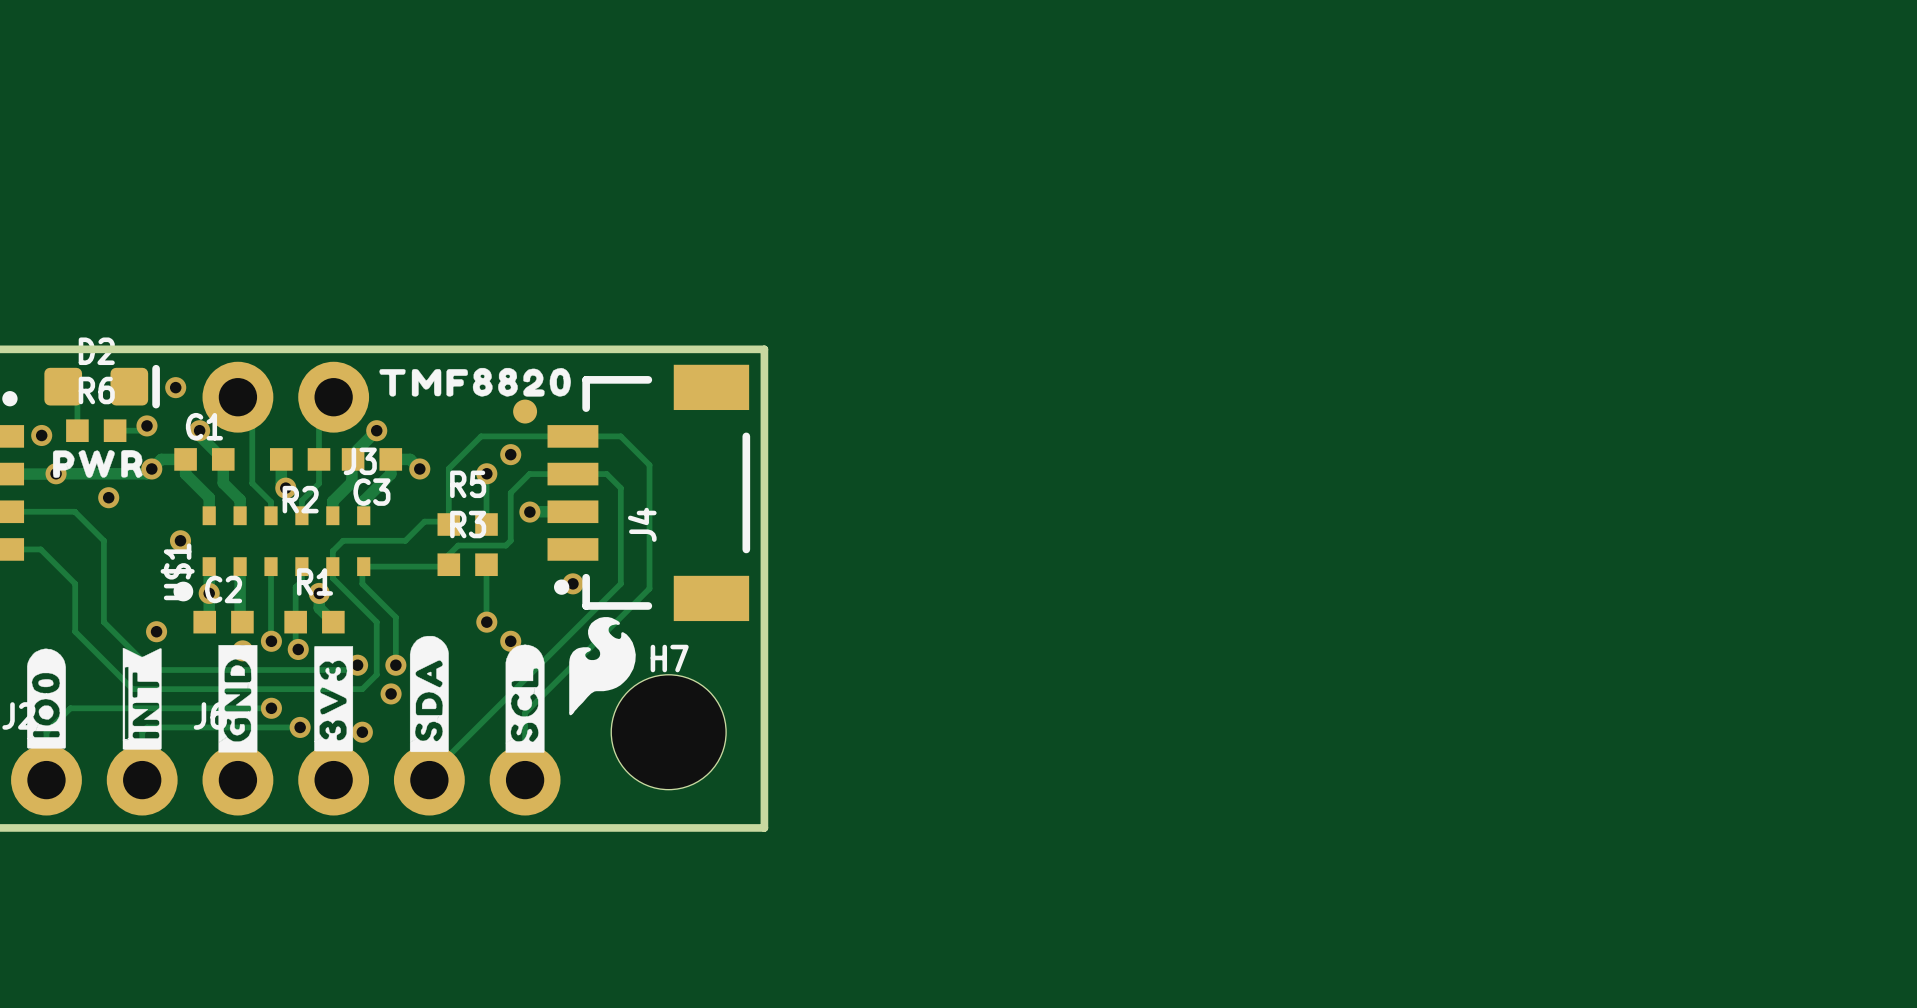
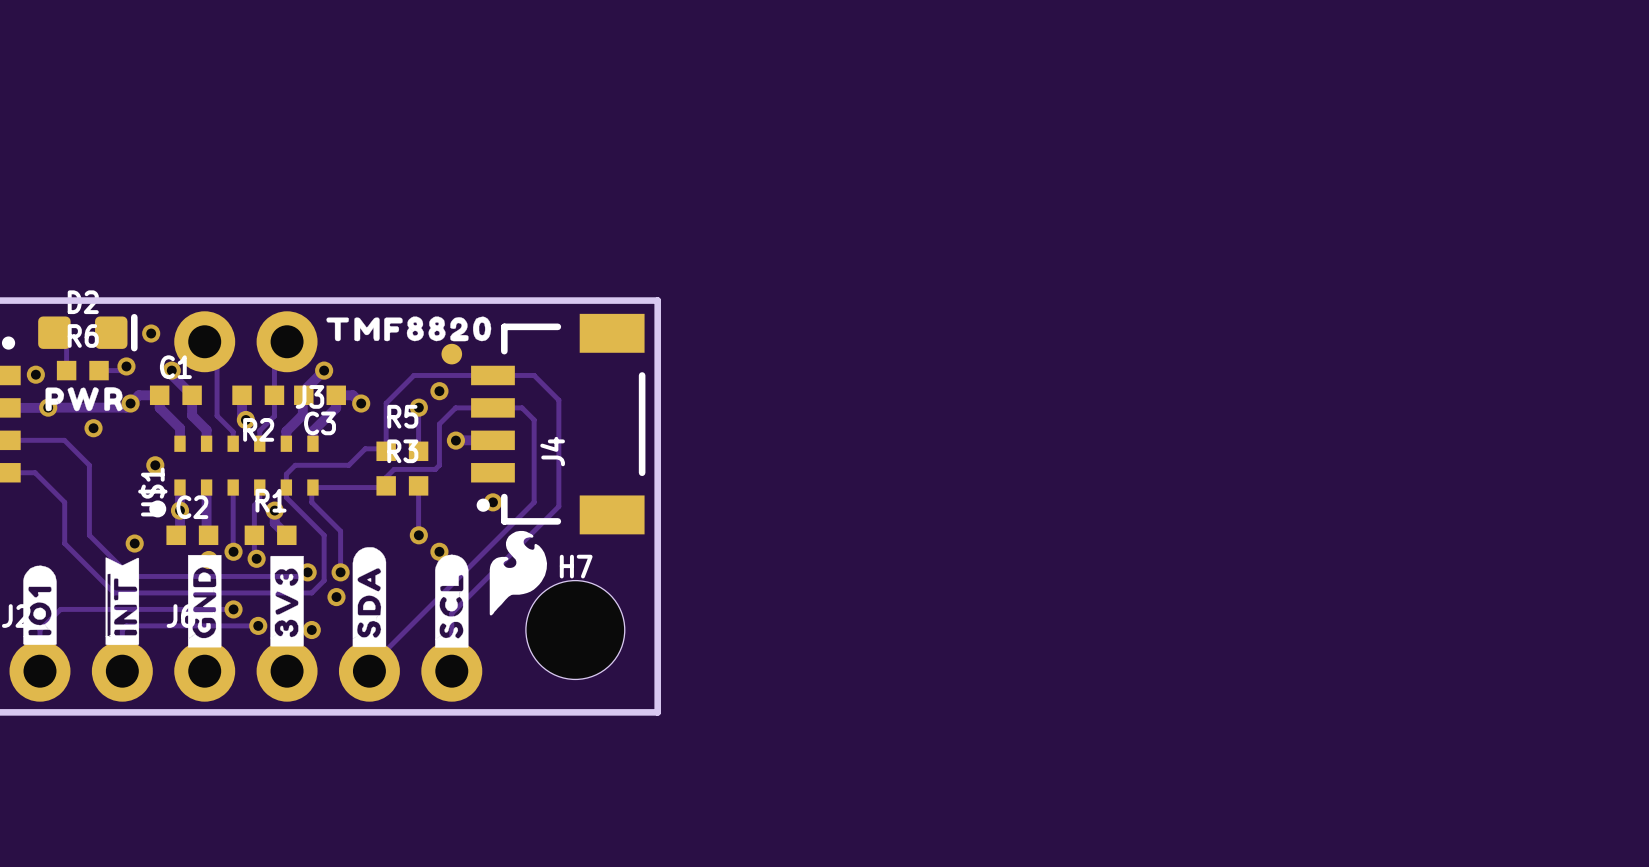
drawing shape: [27, 648, 66, 749] -> [23, 565, 57, 645]

